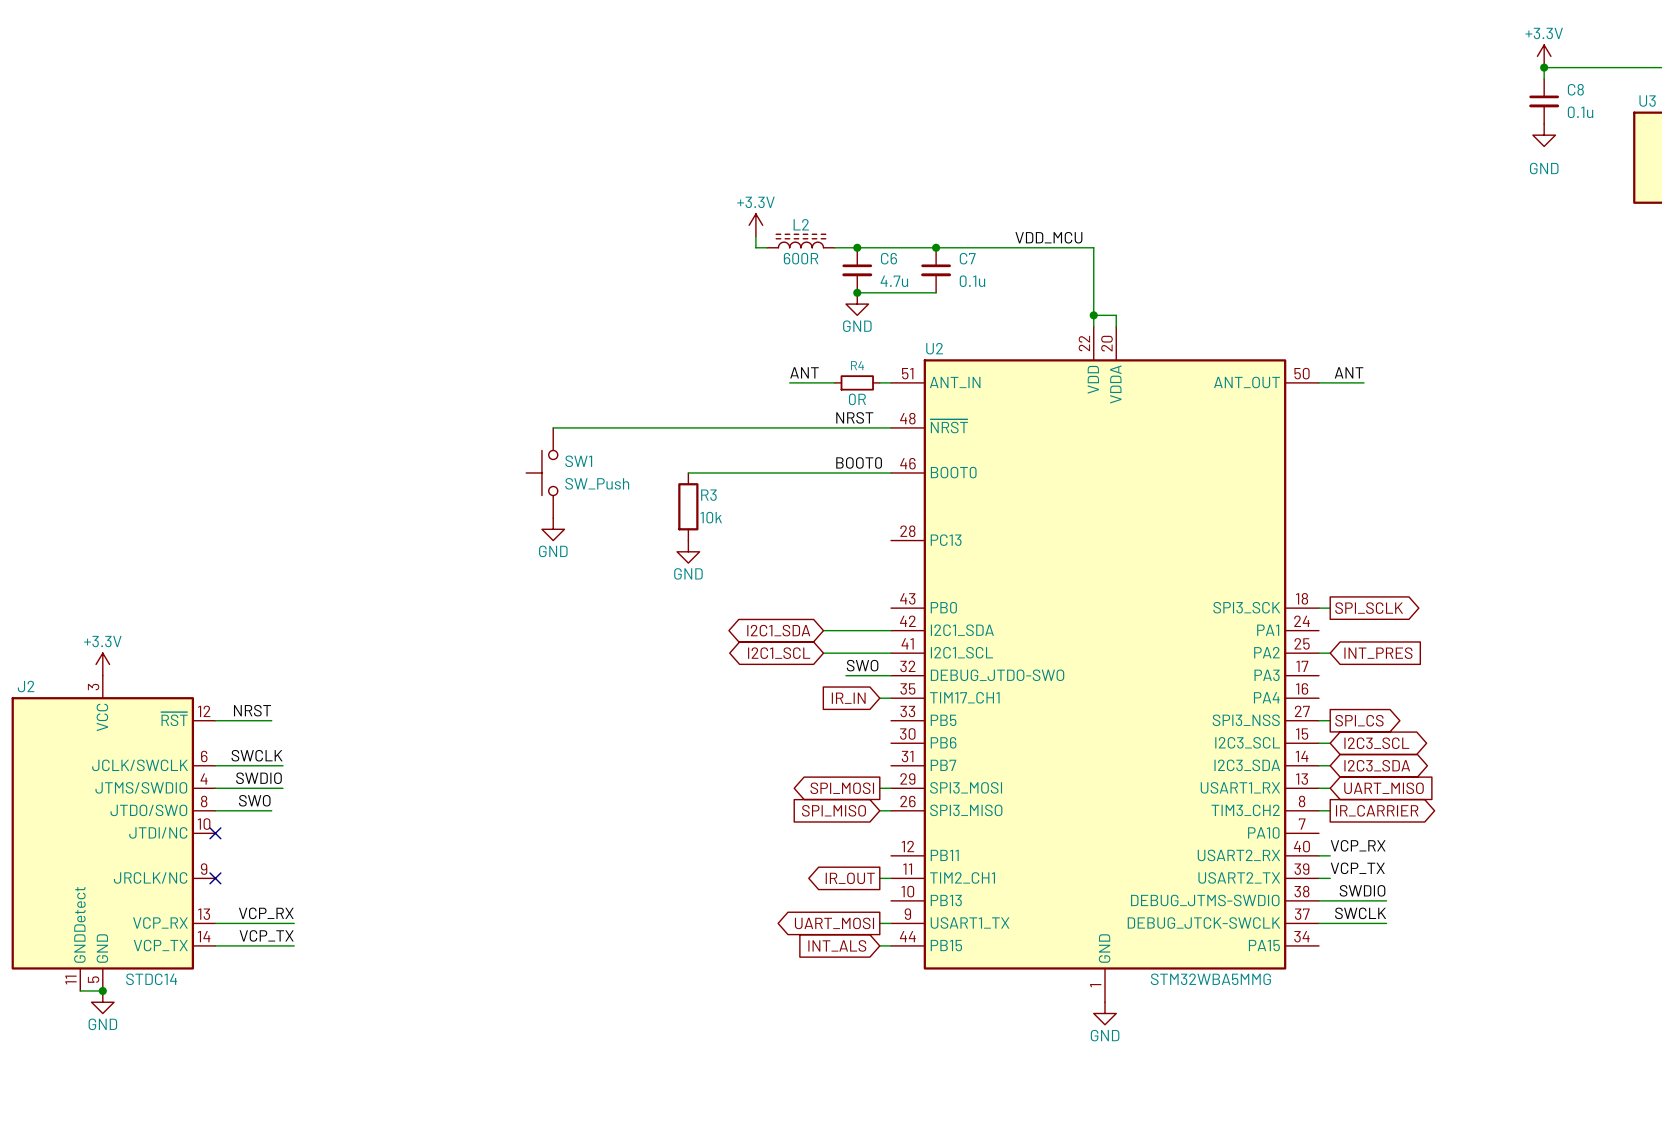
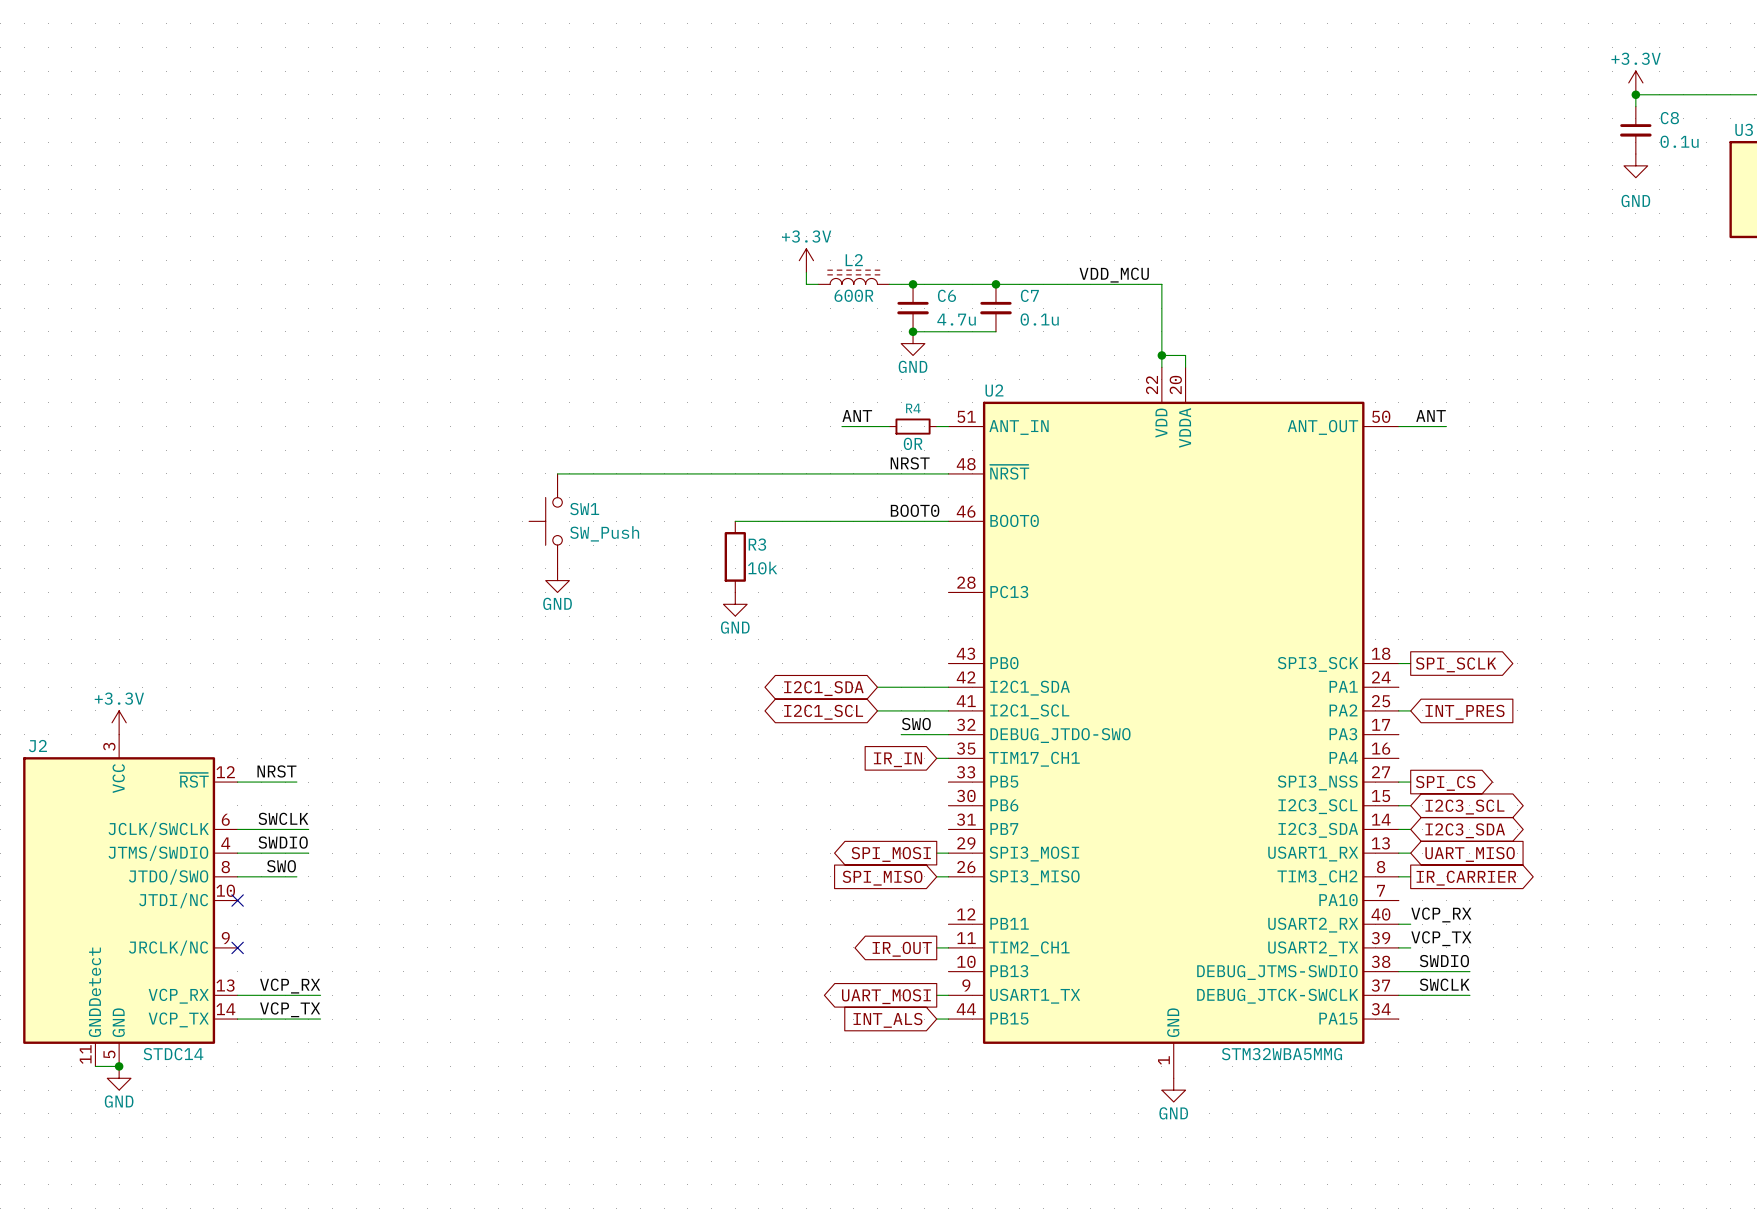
wire: none -> (557, 473) (593, 473)
SW1 position: (541, 472) -> (545, 521)
power symbol position: GND (553, 529) -> GND (557, 580)

